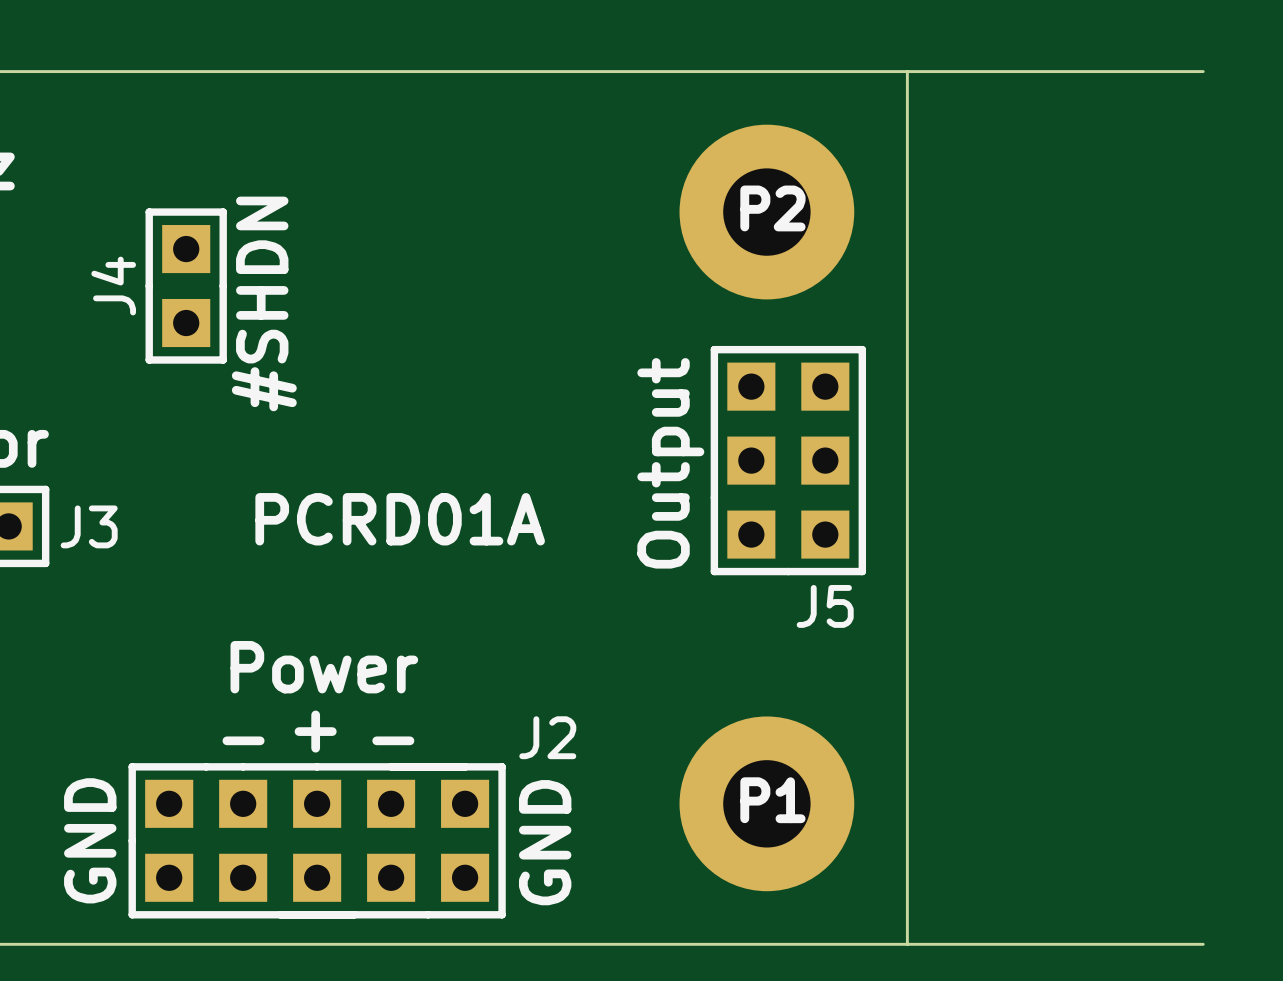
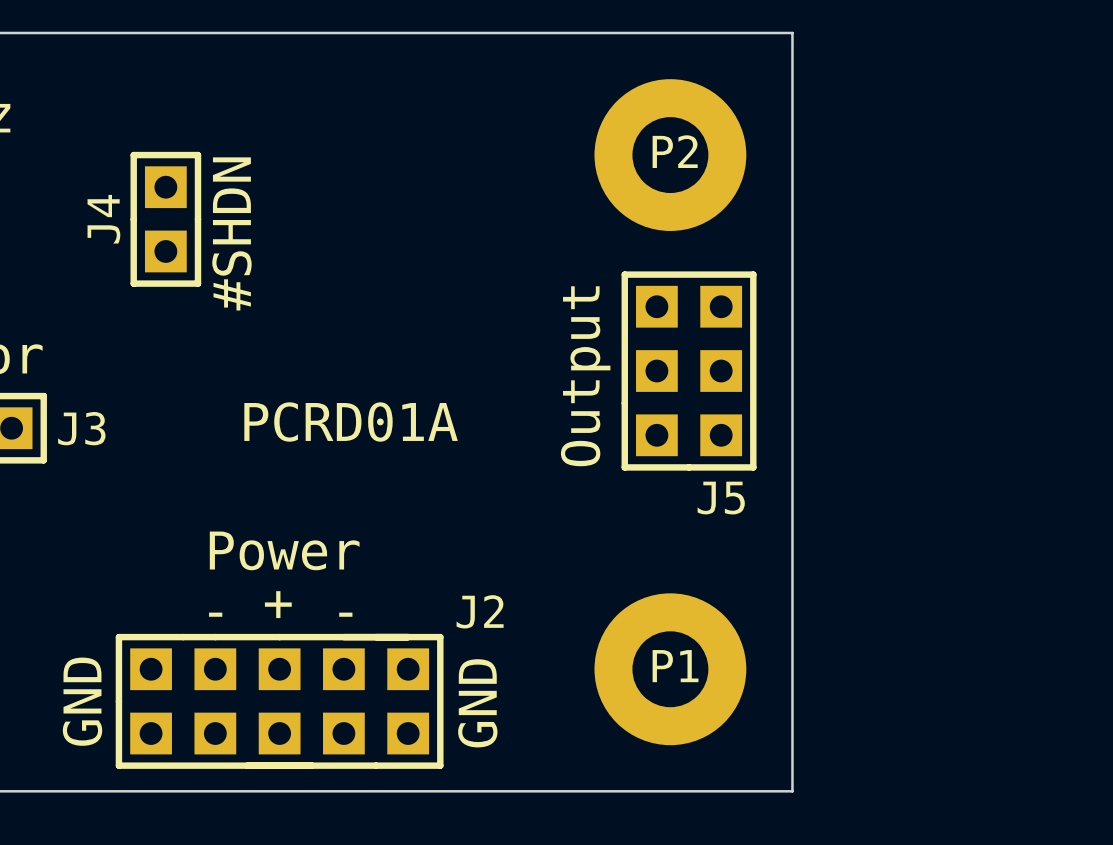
board edge: (907, 71) (1203, 71) -> none
board edge: (907, 944) (1203, 944) -> none

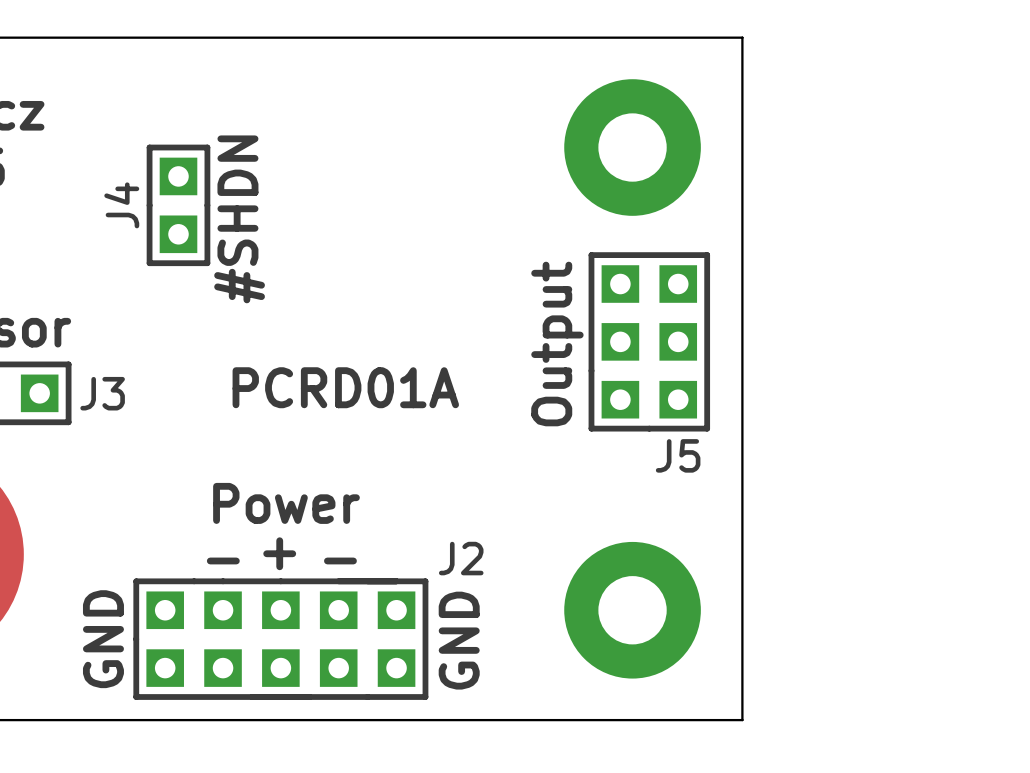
P2 name: P2 (675, 151) -> none
P1 name: P1 (675, 666) -> none

